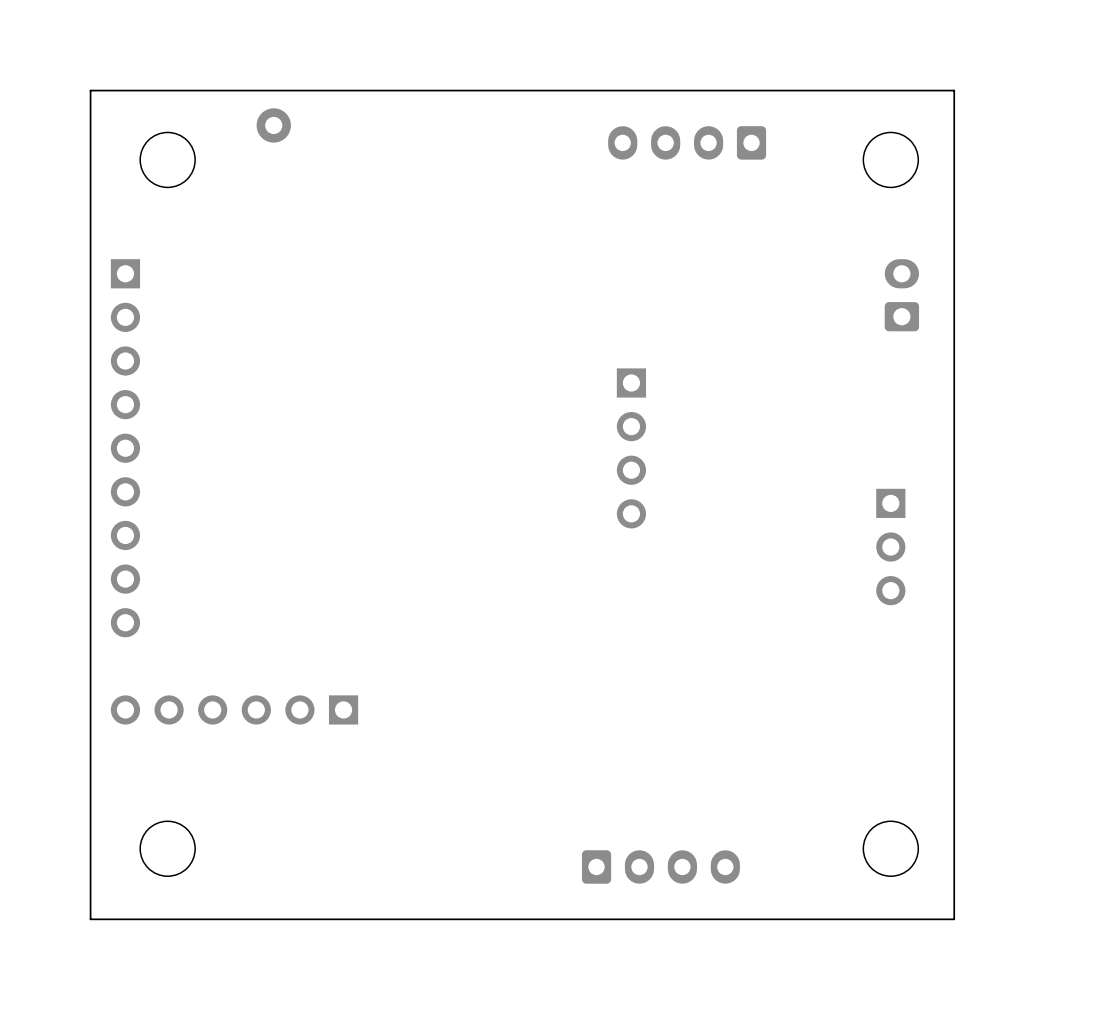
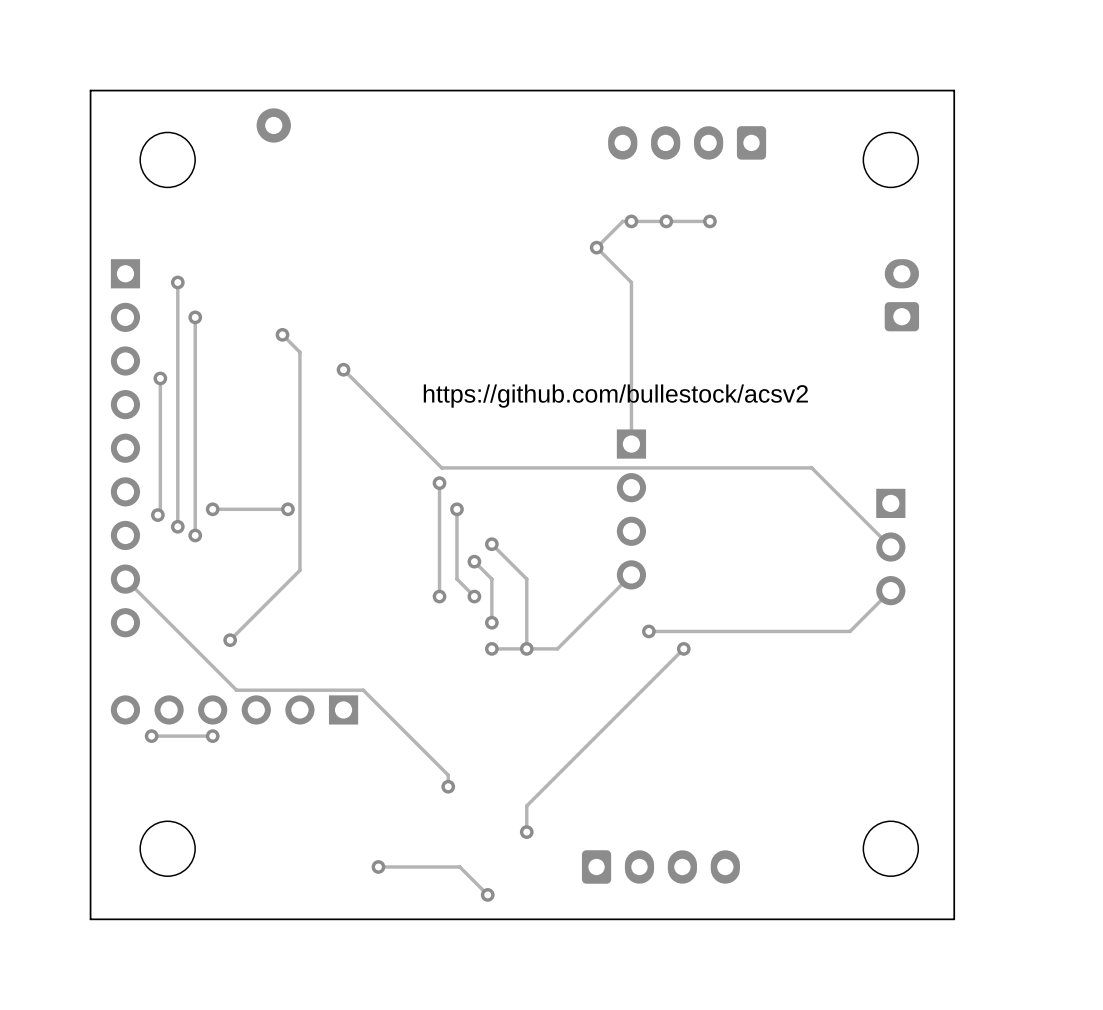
via: none -> (631, 221)
via: none -> (666, 221)
track: none -> (709, 221) (622, 221) (596, 247) (631, 282) (631, 444)
via: none -> (709, 221)
via: none -> (596, 247)
track: none -> (177, 282) (177, 526)
via: none -> (177, 282)
track: none -> (195, 317) (195, 535)
via: none -> (195, 317)
track: none -> (282, 334) (299, 352) (299, 570) (230, 640)
via: none -> (282, 334)
track: none -> (343, 369) (441, 467) (811, 467) (890, 547)
via: none -> (343, 369)
track: none -> (160, 378) (160, 512) (157, 515)
via: none -> (160, 378)
text: none -> https://github.com/bullestock/acsv2 (615, 396)
part position: (631, 448) -> (631, 509)
track: none -> (439, 483) (439, 596)
via: none -> (439, 483)
via: none -> (212, 509)
track: none -> (287, 509) (212, 509)
via: none -> (287, 509)
track: none -> (456, 509) (456, 579) (474, 596)
via: none -> (456, 509)
via: none -> (157, 515)
via: none -> (177, 526)
via: none -> (195, 535)
track: none -> (491, 544) (526, 579) (526, 648)
via: none -> (491, 544)
track: none -> (474, 561) (491, 579) (491, 622)
via: none -> (474, 561)
track: none -> (631, 574) (557, 648) (491, 648)
track: none -> (125, 579) (236, 690) (363, 690) (448, 775) (448, 786)
track: none -> (890, 590) (850, 631) (648, 631)
via: none -> (439, 596)
via: none -> (474, 596)
via: none -> (491, 622)
via: none -> (648, 631)
via: none -> (230, 640)
via: none -> (491, 648)
via: none -> (526, 648)
track: none -> (683, 648) (526, 805) (526, 832)
via: none -> (683, 648)
via: none -> (151, 736)
track: none -> (212, 736) (151, 736)
via: none -> (212, 736)
via: none -> (448, 786)
via: none -> (526, 832)
track: none -> (378, 866) (459, 866) (487, 894)
via: none -> (378, 866)
via: none -> (487, 894)

